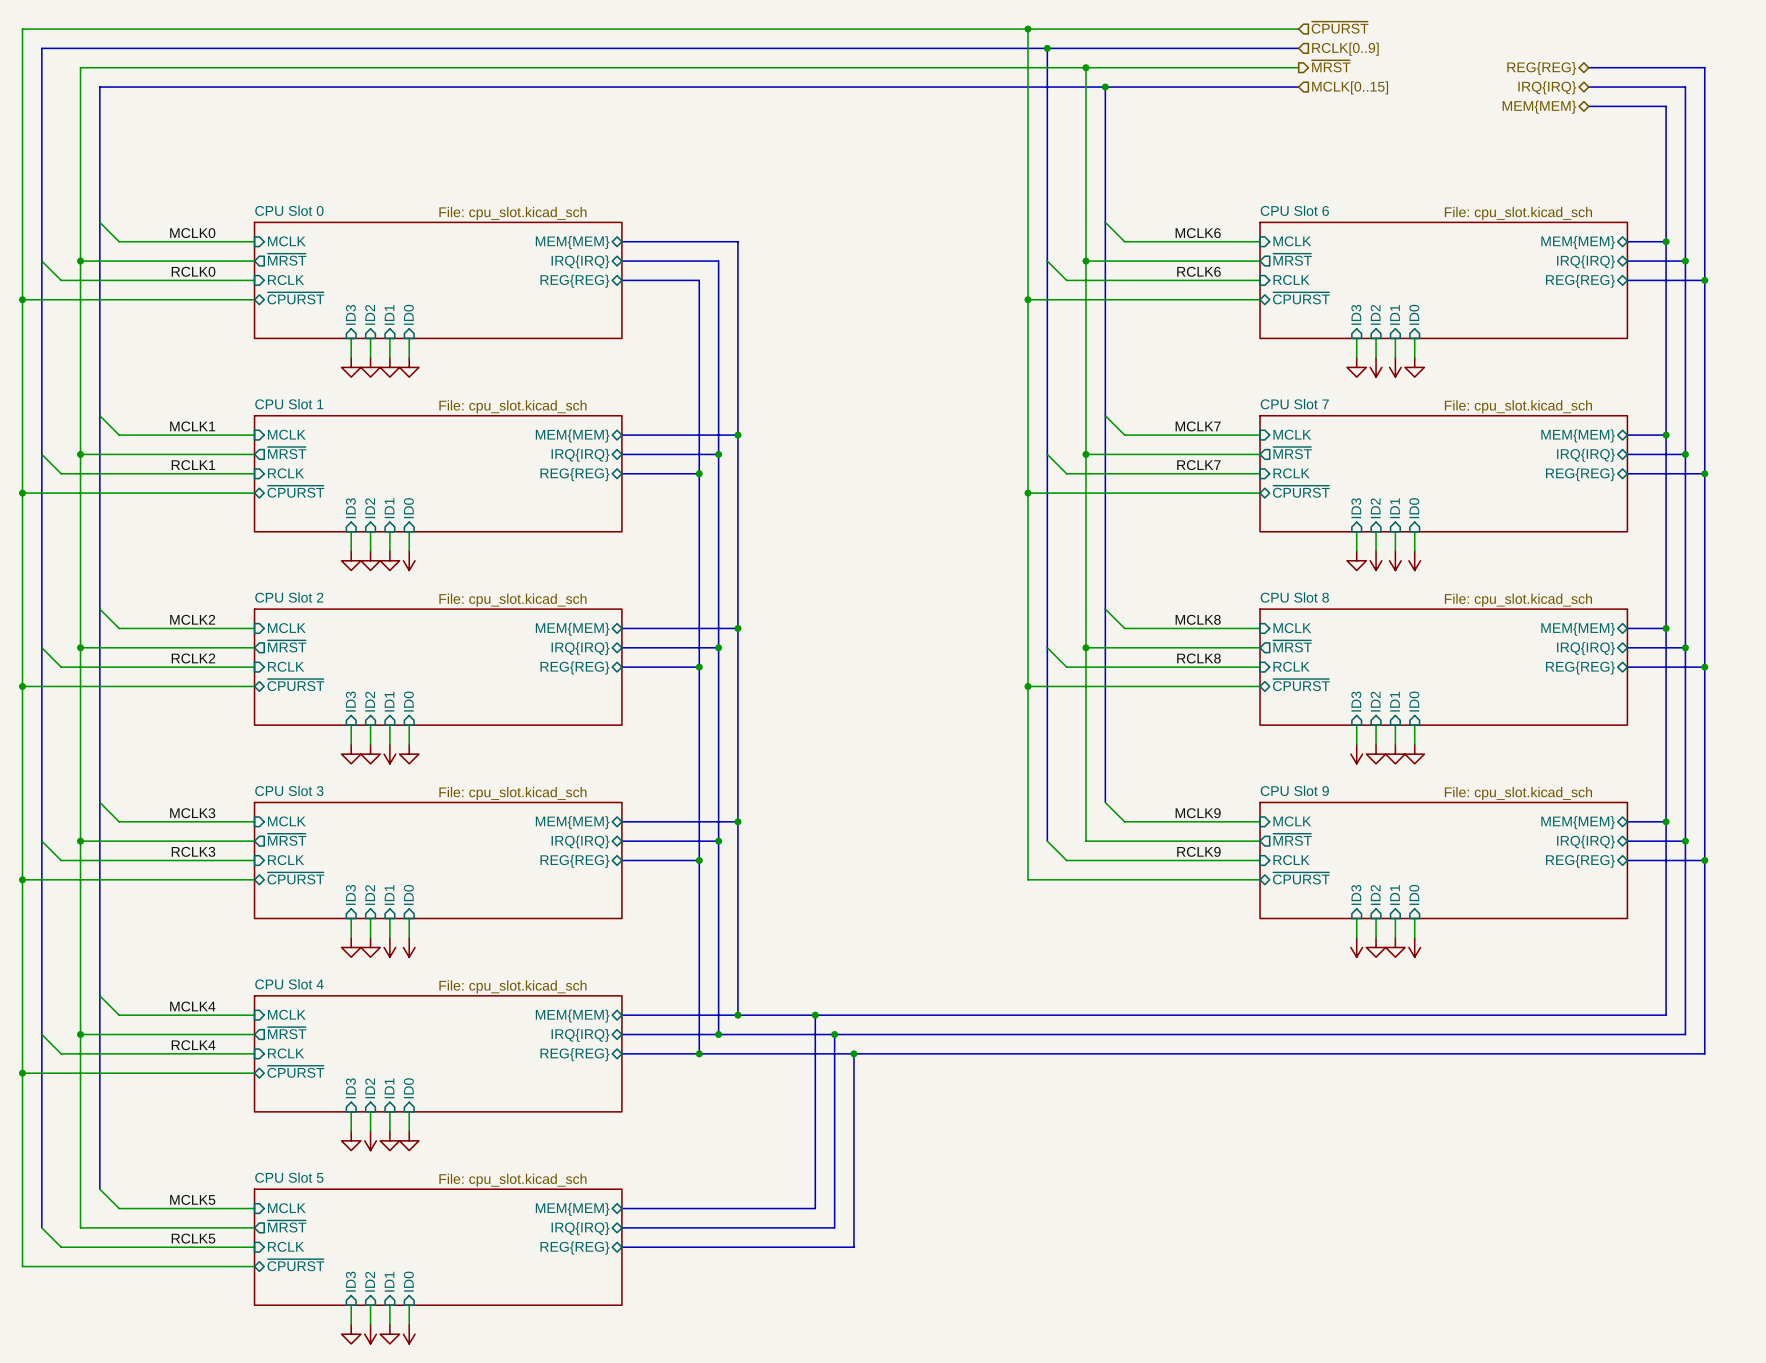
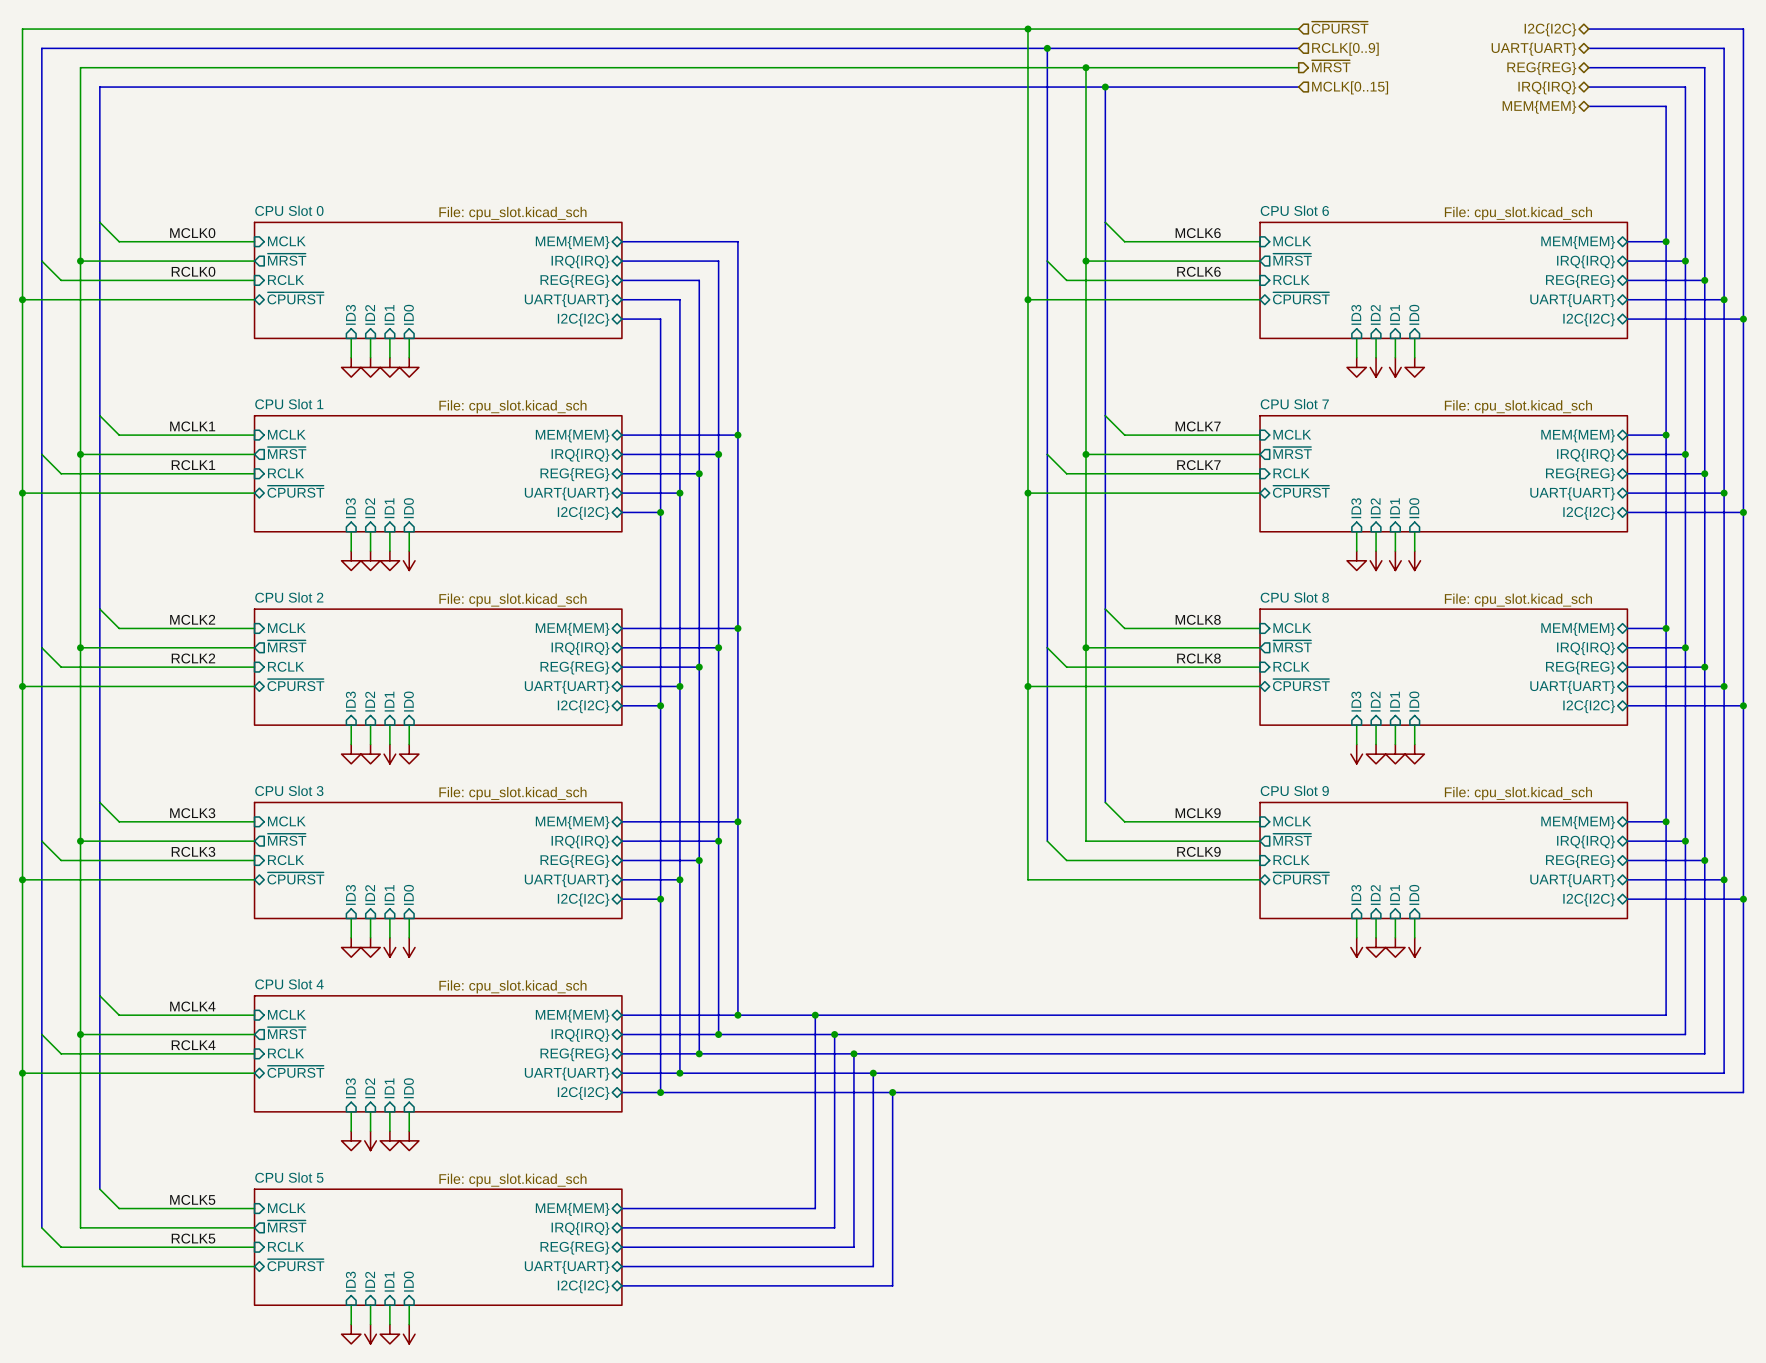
hierarchical label: none -> I2C{I2C} (1550, 29)
bus: none -> (1588, 29) (1743, 29) (1743, 1092) (621, 1092)
bus: none -> (1588, 48) (1724, 48) (1724, 1073) (621, 1073)
hierarchical label: none -> UART{UART} (1533, 49)
bus: none -> (621, 299) (679, 299) (679, 1073)
bus: none -> (1627, 299) (1724, 299)
junction: none -> (1724, 299)
sheet pin: none -> UART{UART} (567, 300)
sheet pin: none -> UART{UART} (1572, 300)
sheet pin: none -> I2C{I2C} (583, 319)
bus: none -> (621, 319) (660, 319) (660, 1092)
sheet pin: none -> I2C{I2C} (1589, 319)
bus: none -> (1627, 319) (1743, 319)
junction: none -> (1743, 319)
sheet pin: none -> UART{UART} (567, 493)
bus: none -> (621, 493) (679, 493)
junction: none -> (679, 493)
sheet pin: none -> UART{UART} (1572, 493)
bus: none -> (1627, 493) (1724, 493)
junction: none -> (1724, 493)
bus: none -> (621, 512) (660, 512)
junction: none -> (660, 512)
bus: none -> (1627, 512) (1743, 512)
junction: none -> (1743, 512)
sheet pin: none -> I2C{I2C} (583, 513)
sheet pin: none -> I2C{I2C} (1589, 513)
bus: none -> (621, 686) (679, 686)
junction: none -> (679, 686)
bus: none -> (1627, 686) (1724, 686)
junction: none -> (1724, 686)
sheet pin: none -> UART{UART} (567, 687)
sheet pin: none -> UART{UART} (1572, 687)
bus: none -> (621, 705) (660, 705)
junction: none -> (660, 705)
bus: none -> (1627, 705) (1743, 705)
junction: none -> (1743, 705)
sheet pin: none -> I2C{I2C} (583, 706)
sheet pin: none -> I2C{I2C} (1589, 706)
bus: none -> (621, 879) (679, 879)
junction: none -> (679, 879)
bus: none -> (1627, 879) (1724, 879)
junction: none -> (1724, 879)
sheet pin: none -> UART{UART} (567, 880)
sheet pin: none -> UART{UART} (1572, 880)
bus: none -> (621, 899) (660, 899)
junction: none -> (660, 899)
bus: none -> (1627, 899) (1743, 899)
junction: none -> (1743, 899)
sheet pin: none -> I2C{I2C} (583, 900)
sheet pin: none -> I2C{I2C} (1589, 900)
junction: none -> (679, 1073)
bus: none -> (873, 1073) (873, 1266) (621, 1266)
junction: none -> (873, 1073)
sheet pin: none -> UART{UART} (567, 1074)
junction: none -> (660, 1092)
bus: none -> (892, 1092) (892, 1285) (621, 1285)
junction: none -> (892, 1092)
sheet pin: none -> I2C{I2C} (583, 1093)
sheet pin: none -> UART{UART} (567, 1267)
sheet pin: none -> I2C{I2C} (583, 1286)

